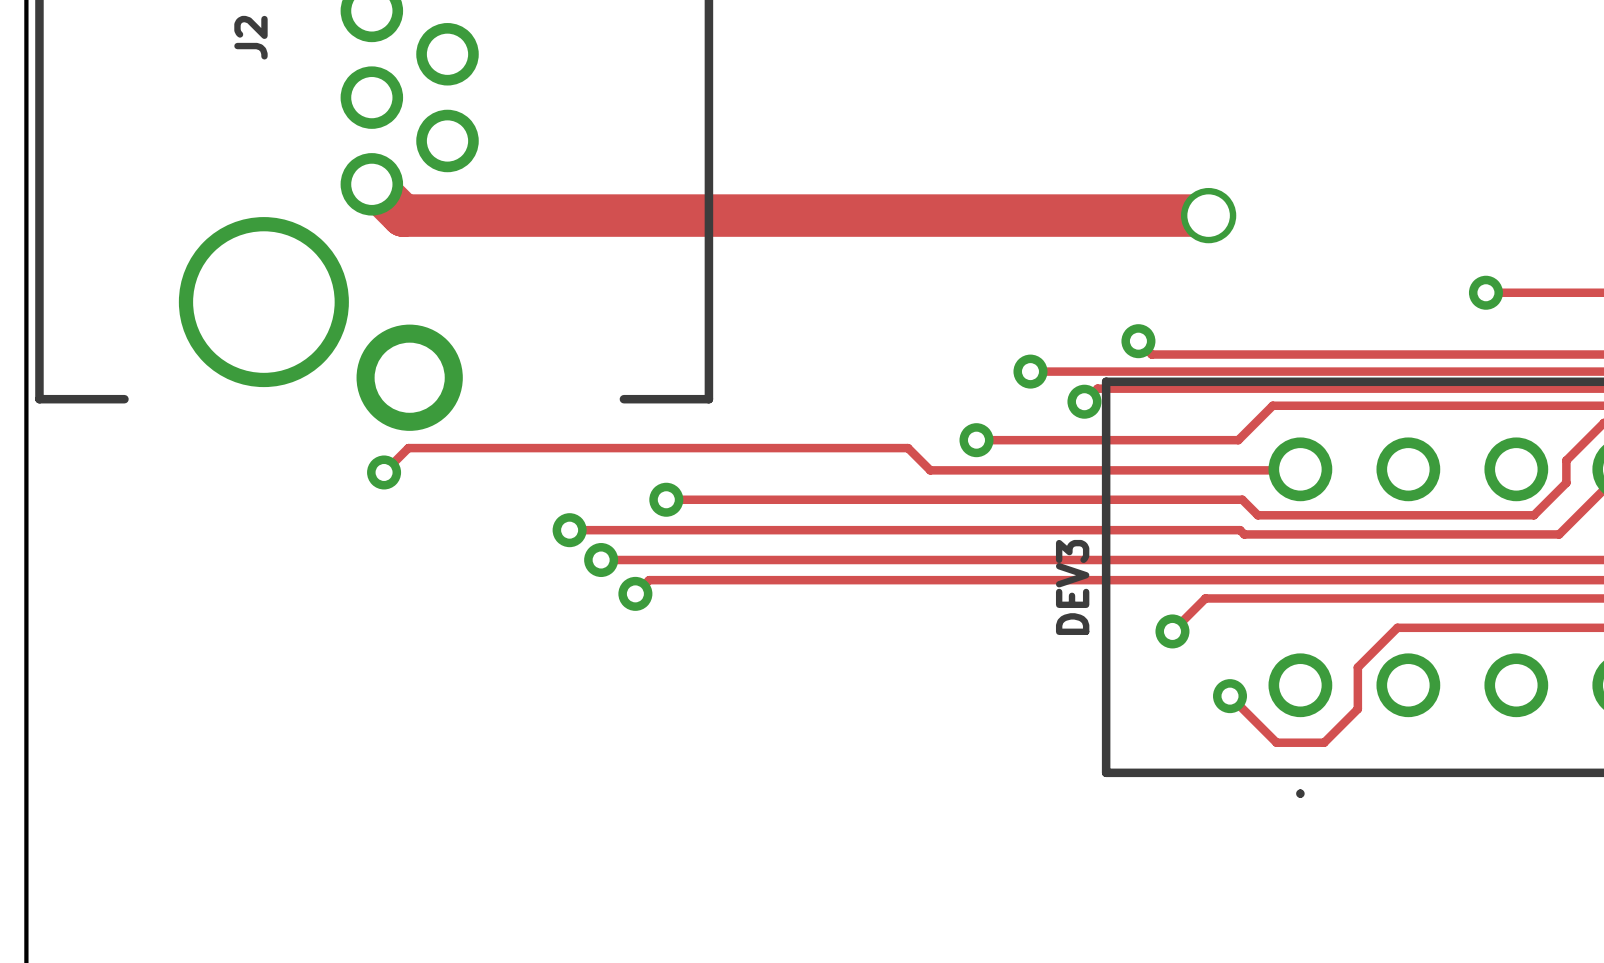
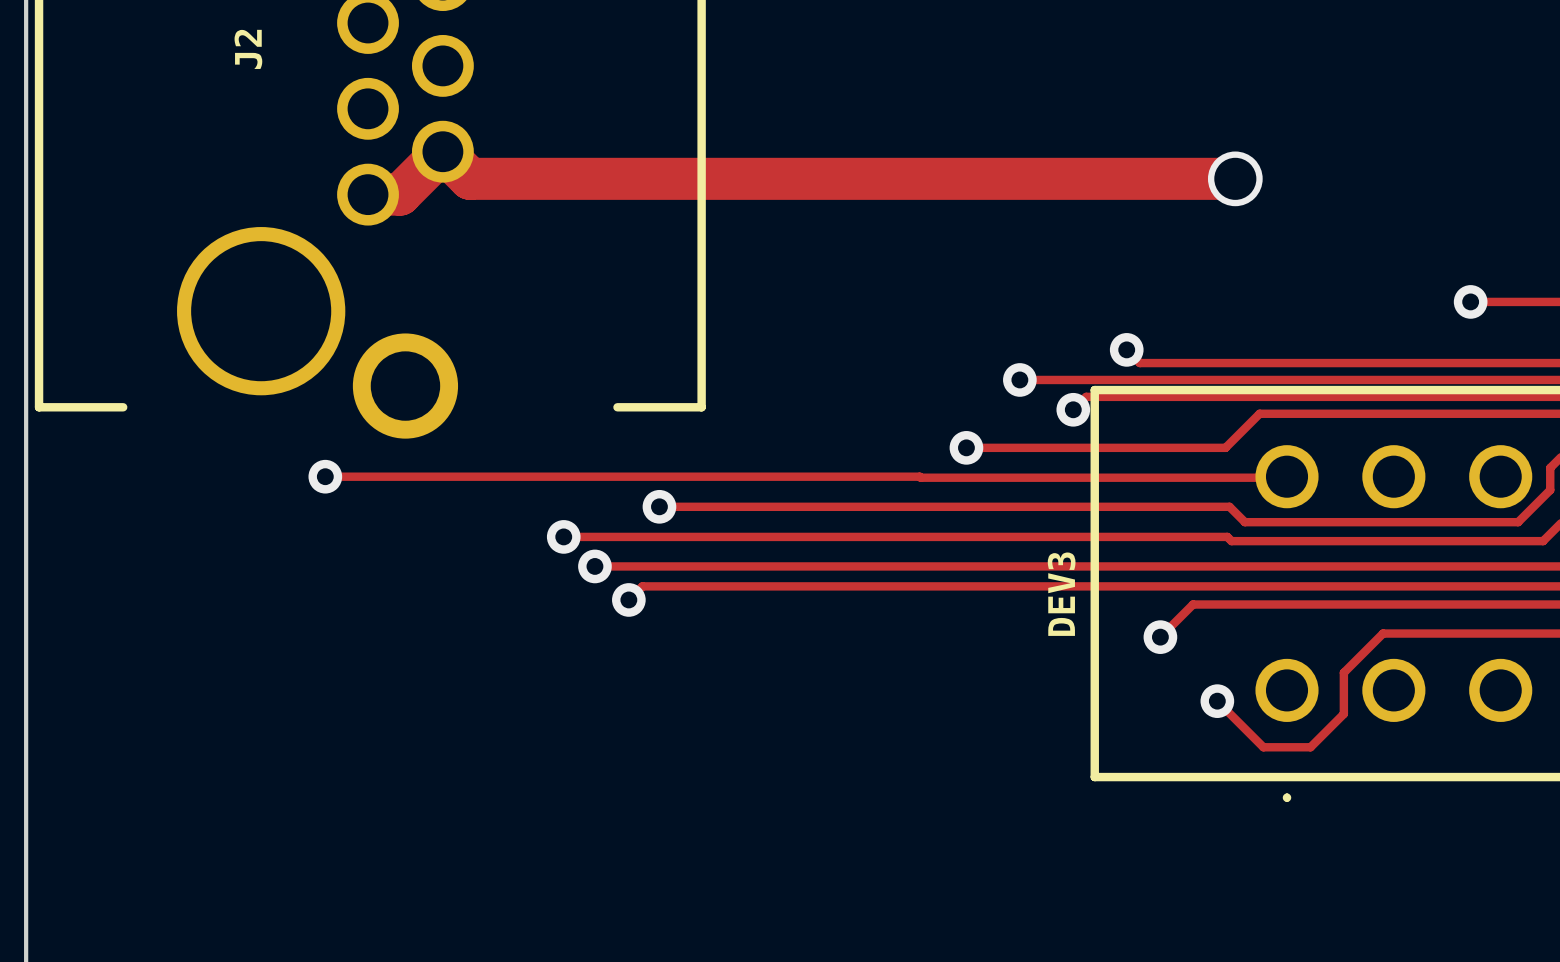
track: (371, 184) (403, 215) (1208, 215) -> (368, 194) (399, 194) (442, 151) (470, 178) (1235, 178)
via position: (1208, 215) -> (1235, 178)
track: (929, 469) (908, 448) (408, 448) (384, 472) -> (919, 476) (325, 476)
via position: (384, 472) -> (325, 476)

